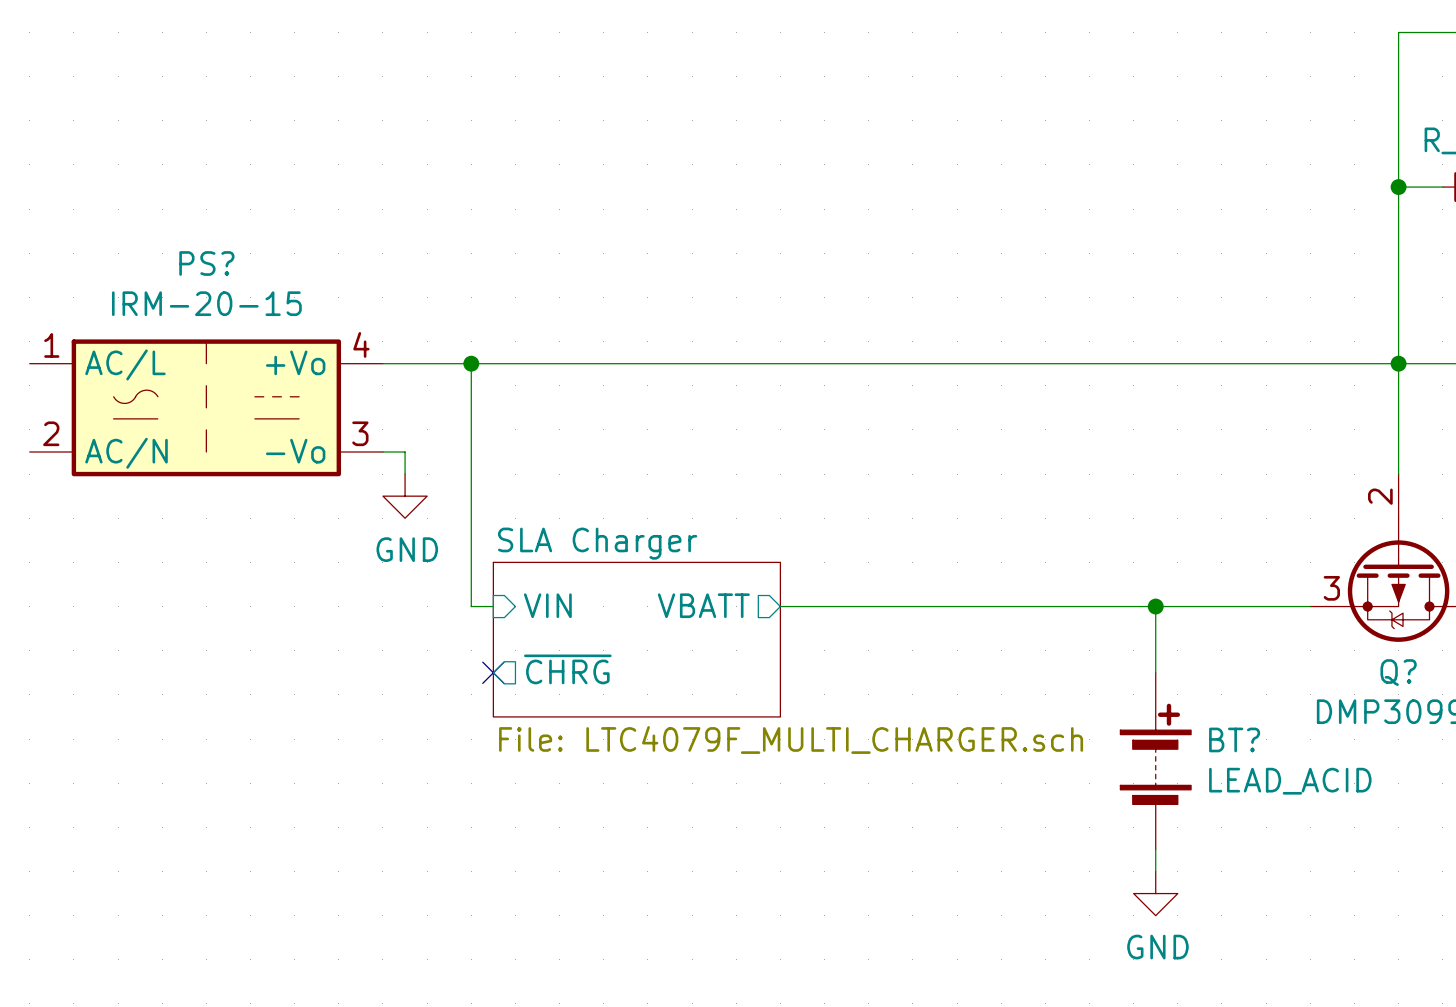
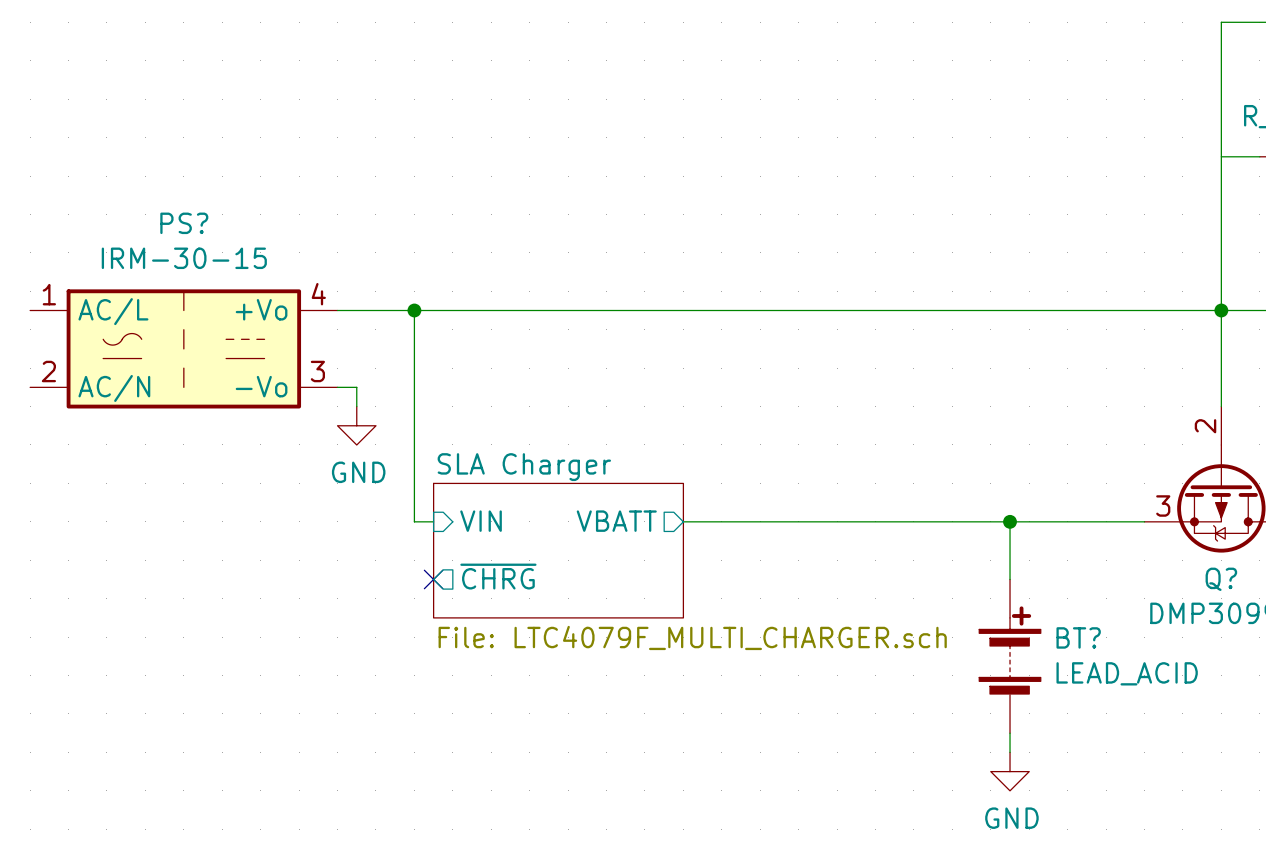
junction: (1398, 187) -> none
PS? value: IRM-20-15 (206, 303) -> IRM-30-15 (184, 258)

